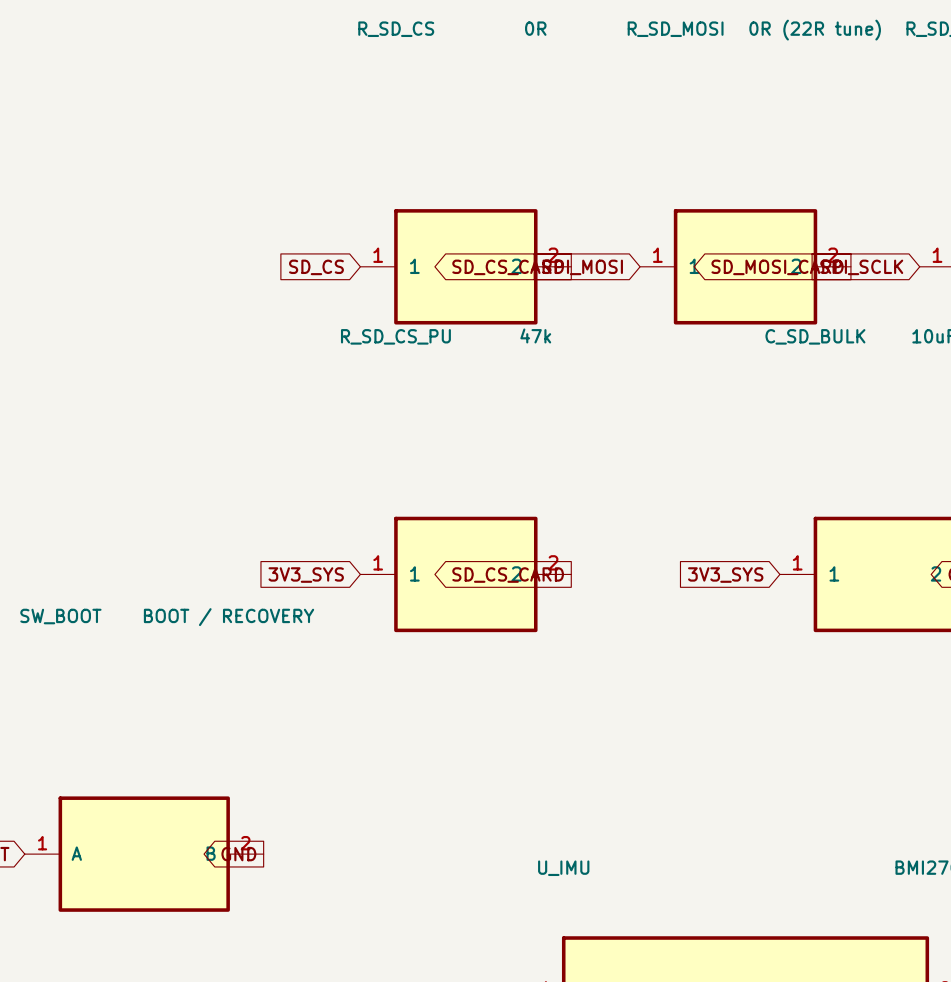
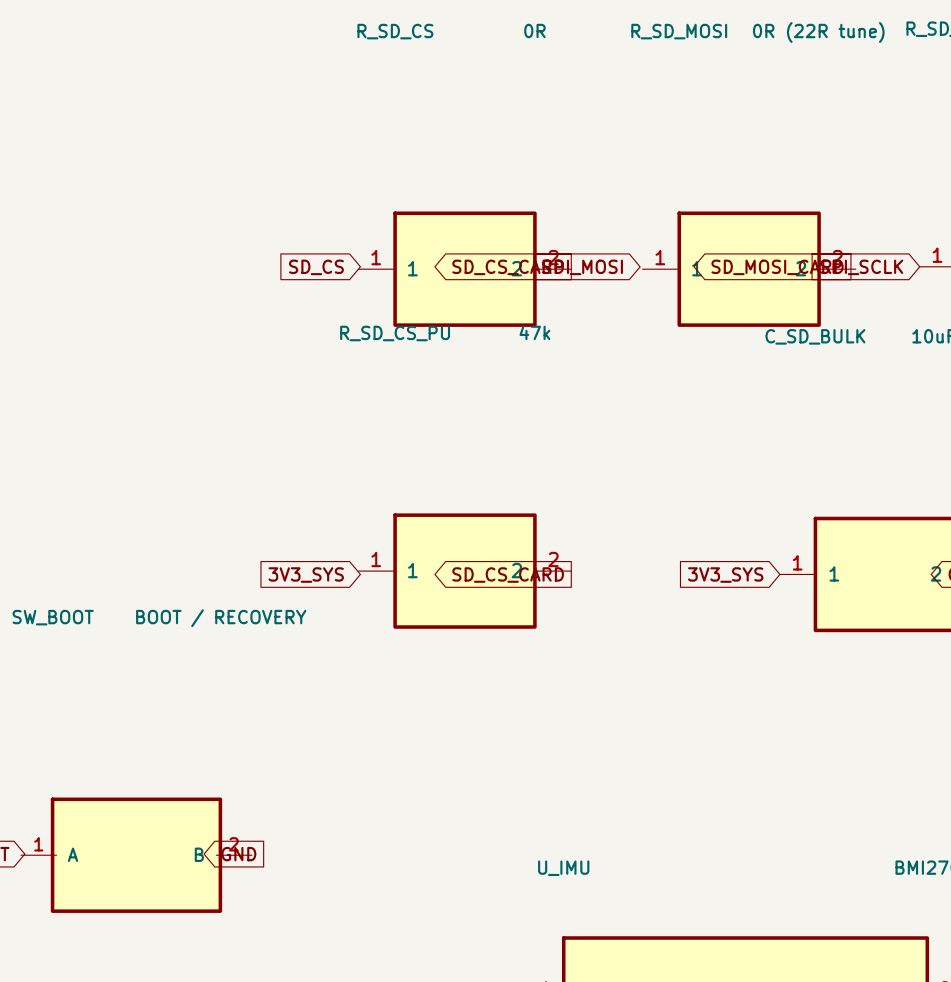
R_SD_CS symbol: [360, 209, 572, 325] -> [358, 211, 572, 327]
R_SD_MOSI symbol: [640, 209, 851, 325] -> [642, 211, 856, 327]
R_SD_CS_PU symbol: [360, 516, 572, 633] -> [358, 513, 572, 629]
SW_BOOT symbol: [24, 796, 264, 912] -> [21, 797, 252, 913]

